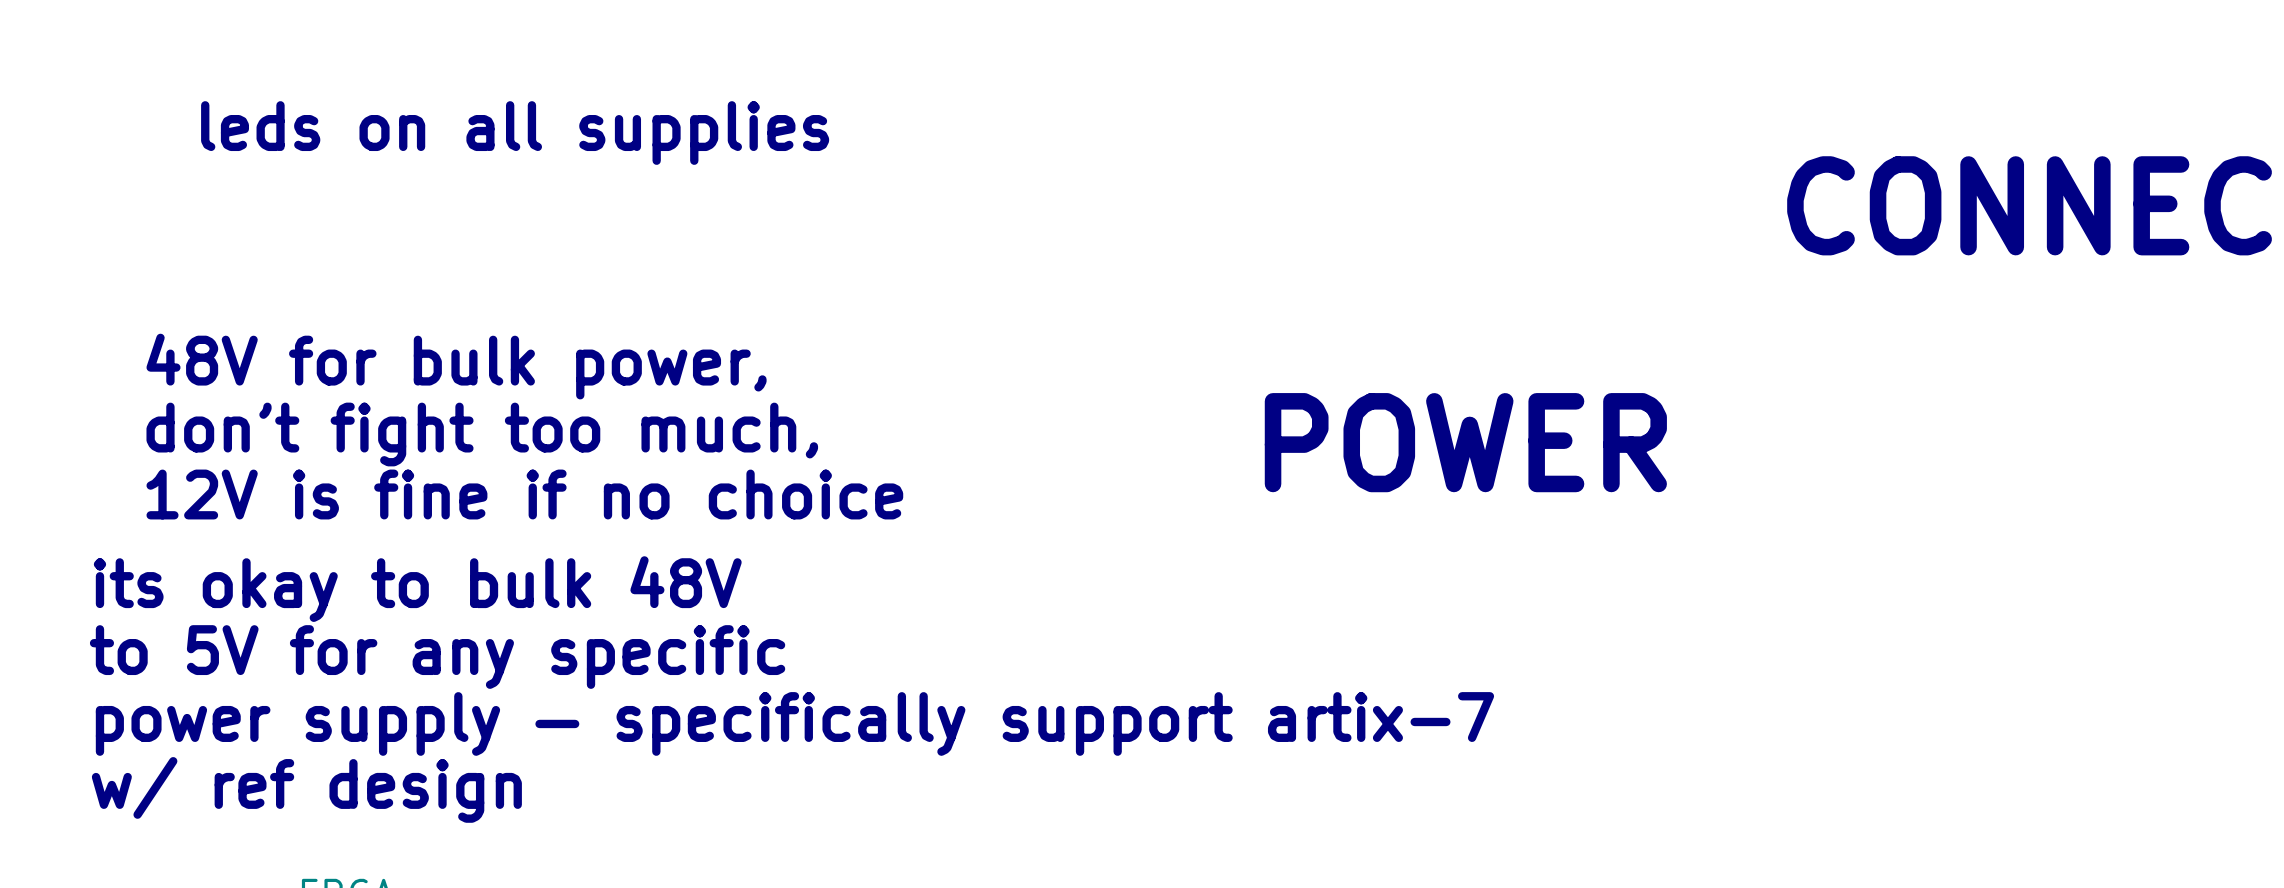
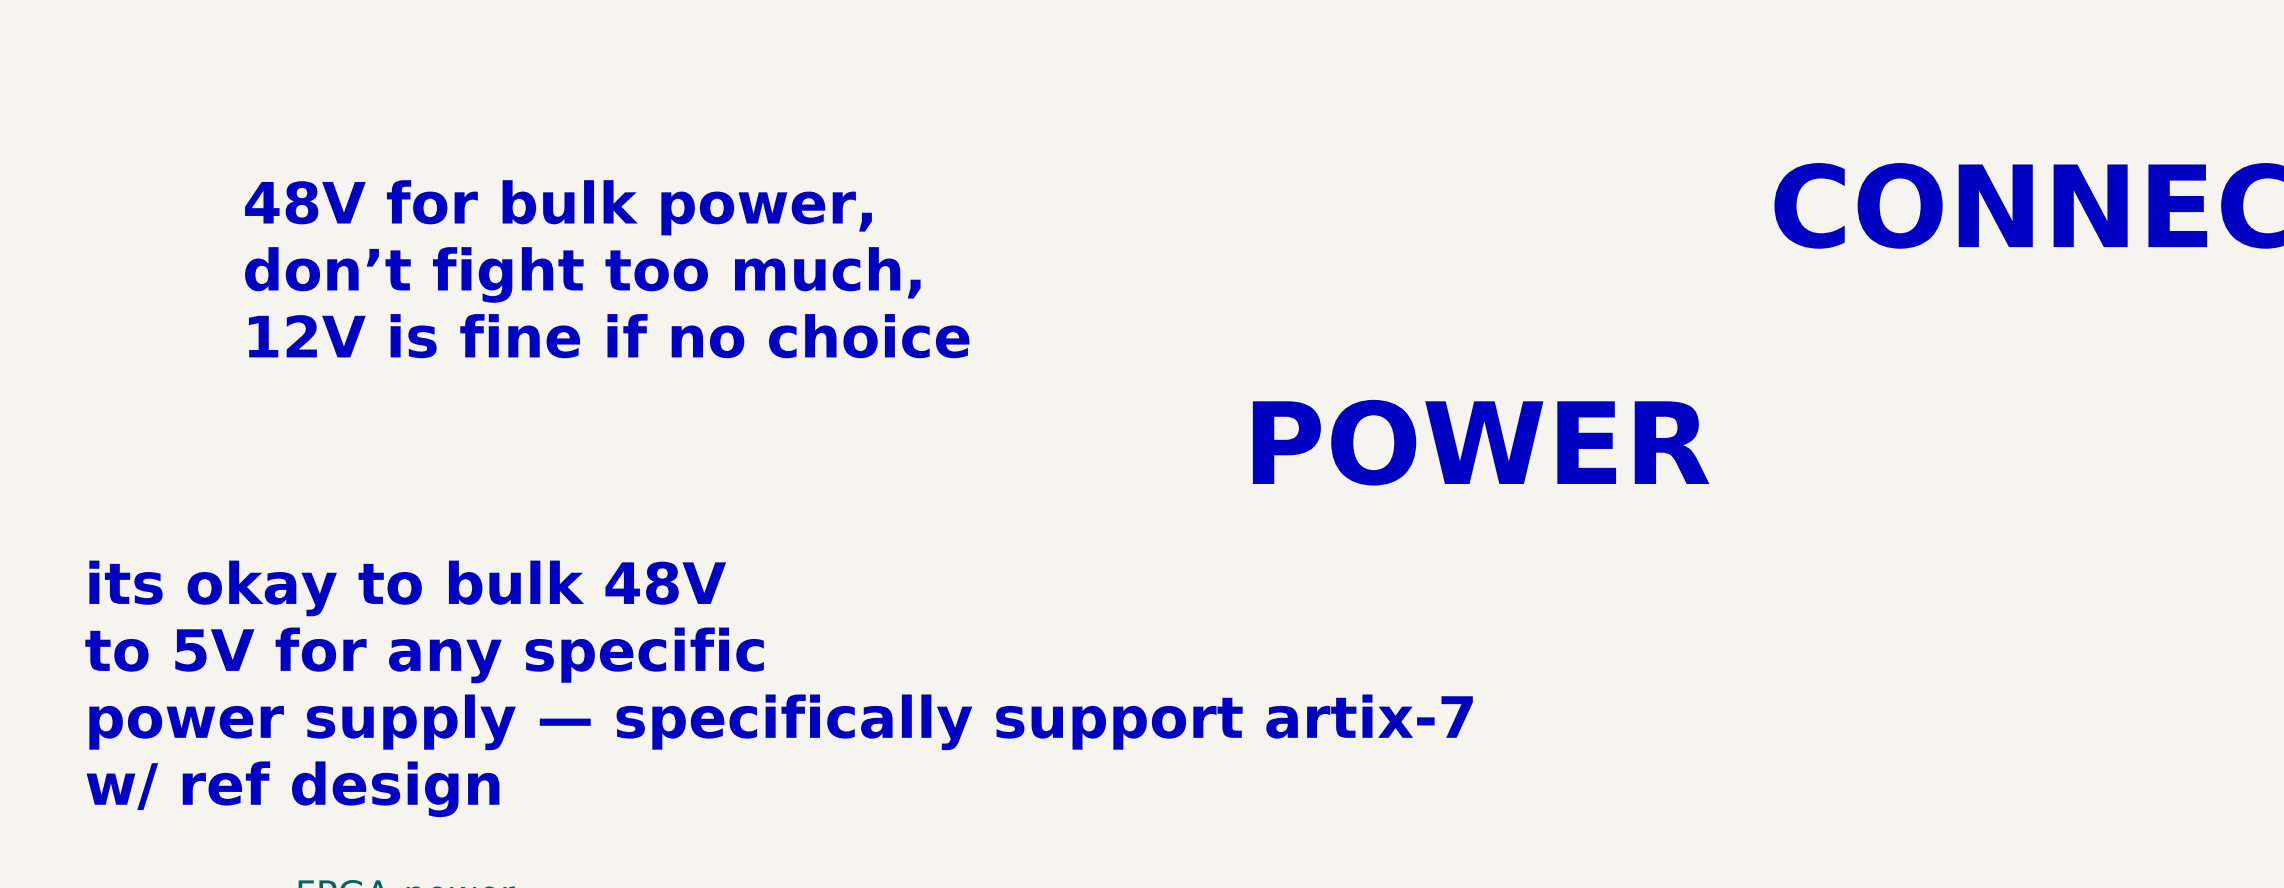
text: leds on all supplies (515, 133) -> none
text position: 48V for bulk power, (456, 366) -> 48V for bulk power, (558, 207)
text position: don’t fight too much, (482, 434) -> don’t fight too much, (582, 274)
text position: 12V is fine if no choice (524, 494) -> 12V is fine if no choice (609, 336)

